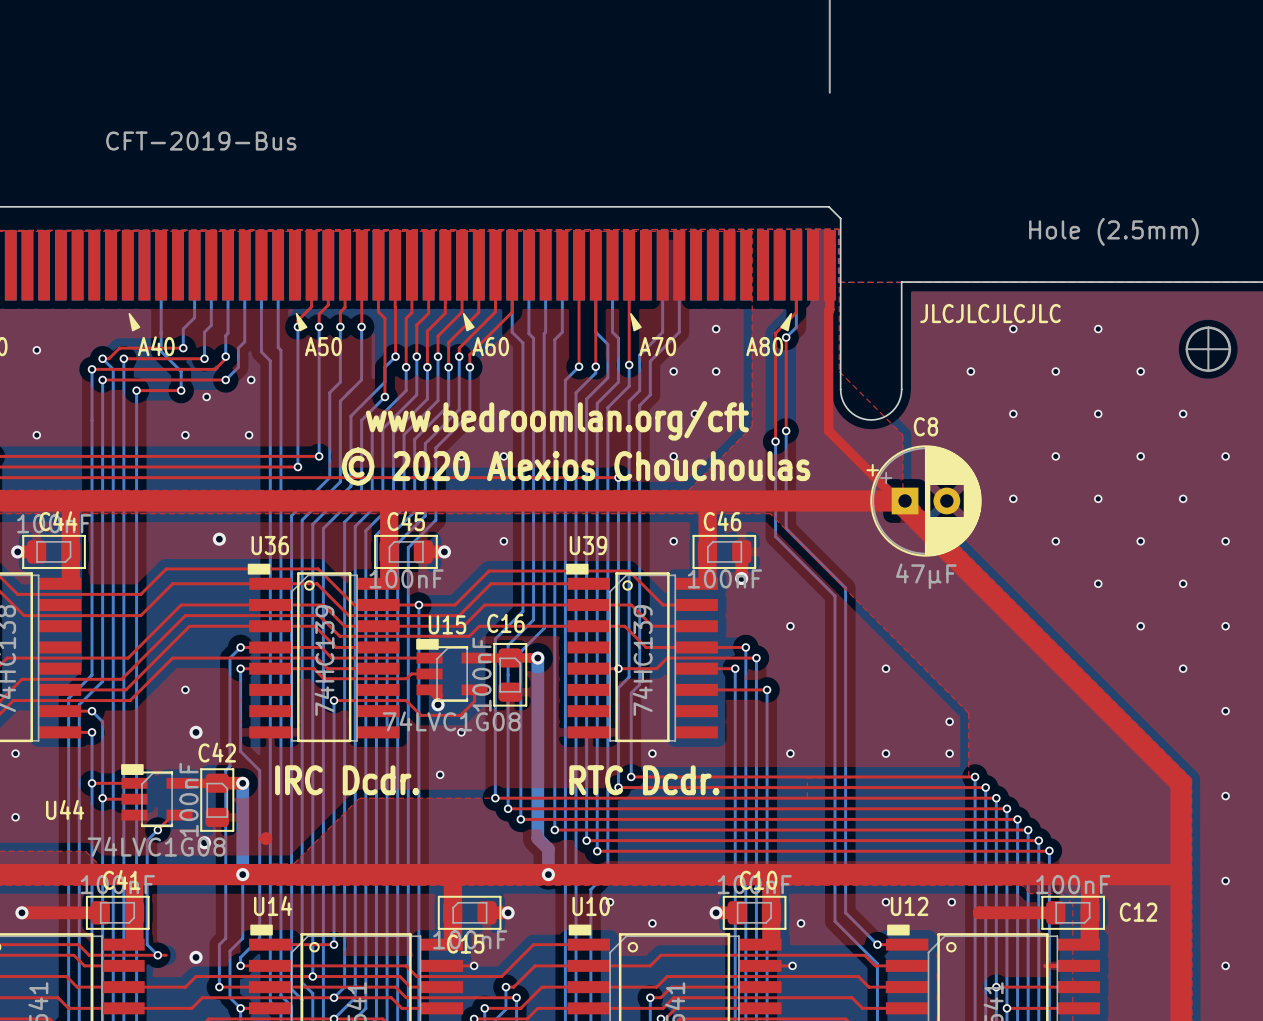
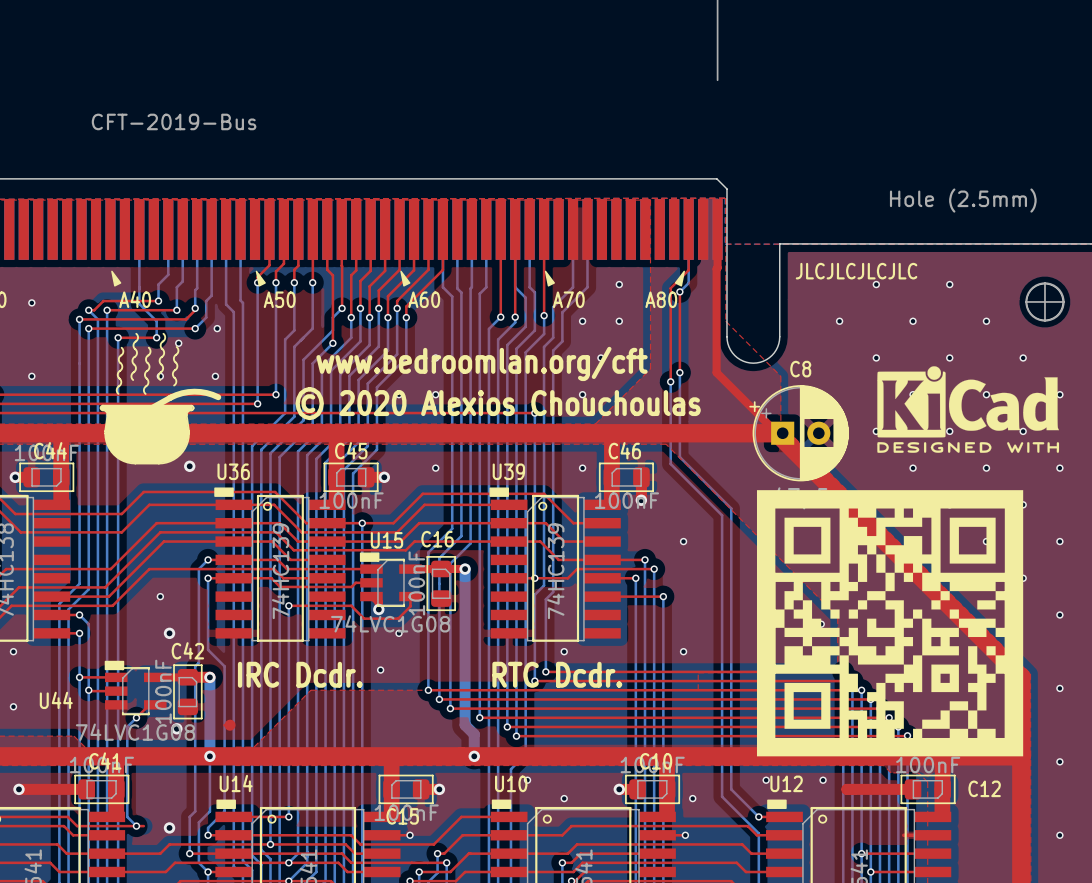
drawing: none -> [99, 332, 222, 465]
drawing: none -> [877, 366, 1060, 453]
drawing: none -> [756, 490, 1024, 757]

